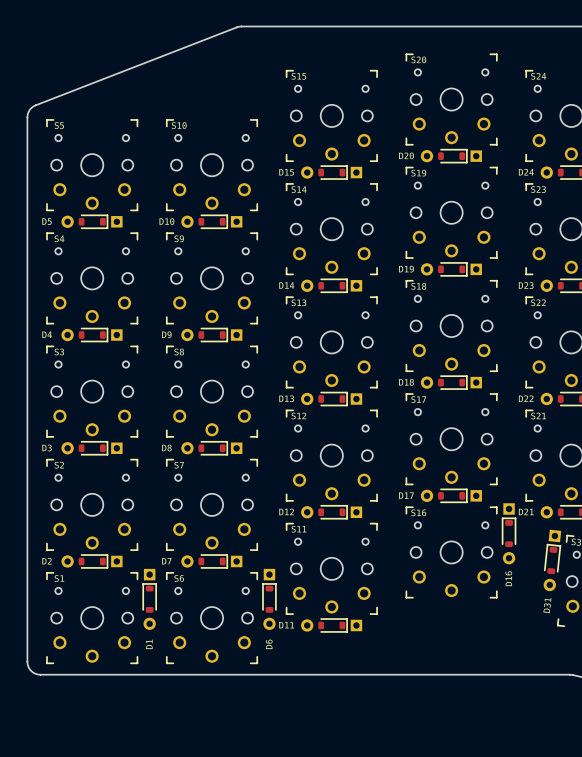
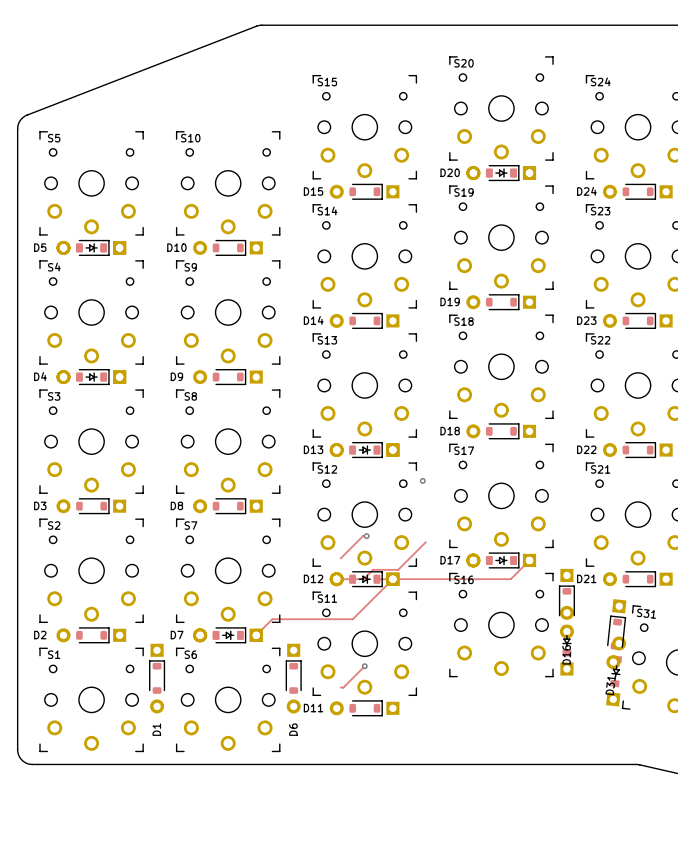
part: none -> (501, 173)
part: none -> (91, 247)
part: none -> (91, 377)
part: none -> (364, 450)
via: none -> (422, 480)
track: none -> (366, 536) (363, 536) (340, 558)
via: none -> (366, 536)
track: none -> (425, 542) (398, 569) (373, 569) (363, 579) (336, 579)
part: none -> (501, 560)
track: none -> (529, 560) (510, 579) (376, 579)
part: none -> (364, 579)
track: none -> (392, 579) (352, 619) (272, 619) (256, 635)
part: none -> (227, 635)
part: none -> (566, 640)
track: none -> (364, 666) (343, 687) (340, 687)
via: none -> (364, 666)
part: none -> (616, 671)

